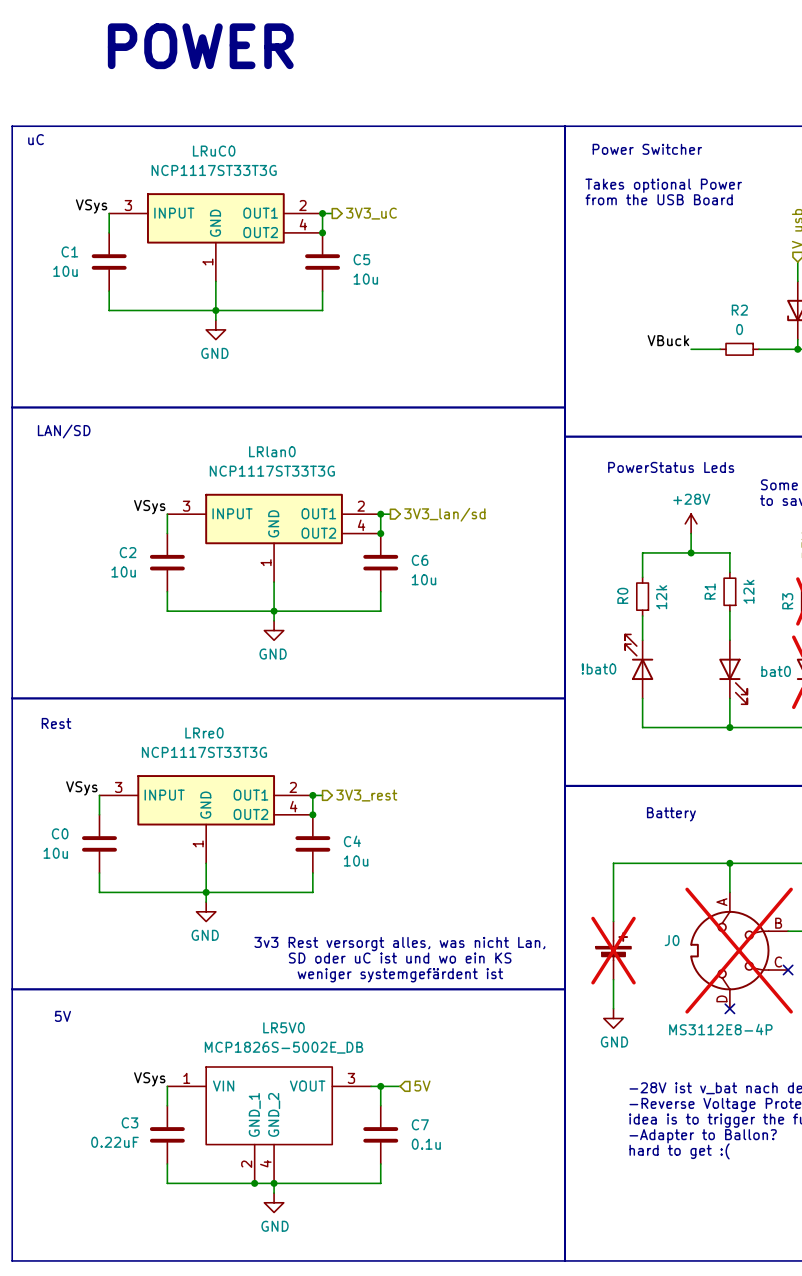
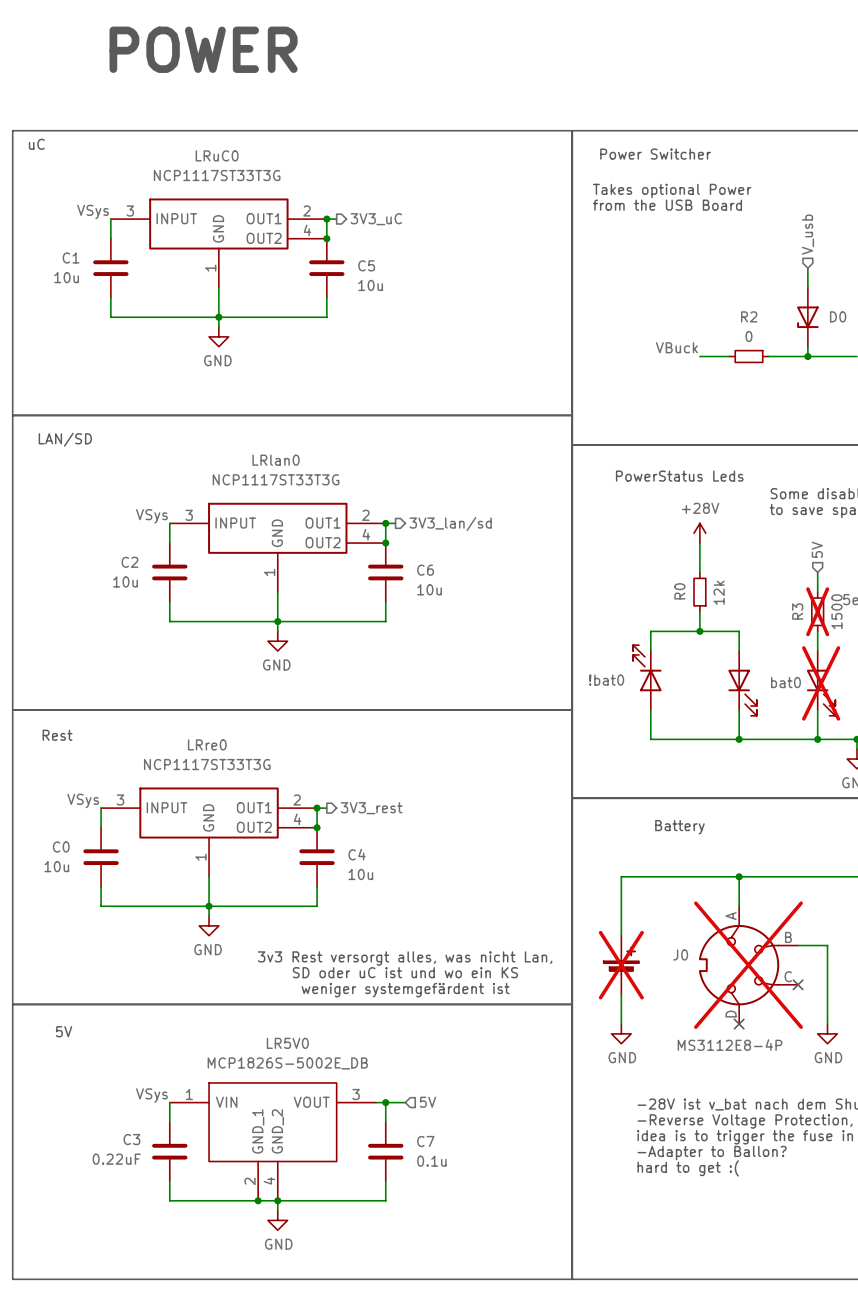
junction: (691, 552) -> none
wire: (729, 572) (729, 552) (642, 552) (642, 577) -> none
R1: 12k (729, 591) -> none
R0 position: (642, 596) -> (699, 592)
wire: none -> (699, 611) (699, 631)
wire: (729, 611) (729, 620) -> (699, 562) (699, 572)
wire: (642, 616) (642, 620) -> (739, 631) (650, 631)
junction: none -> (699, 631)

